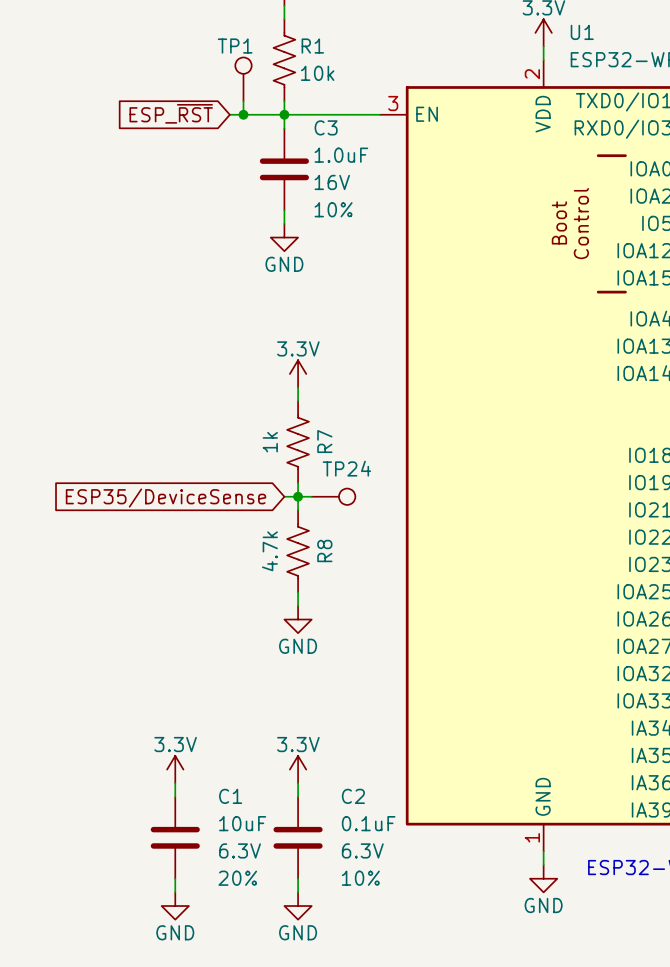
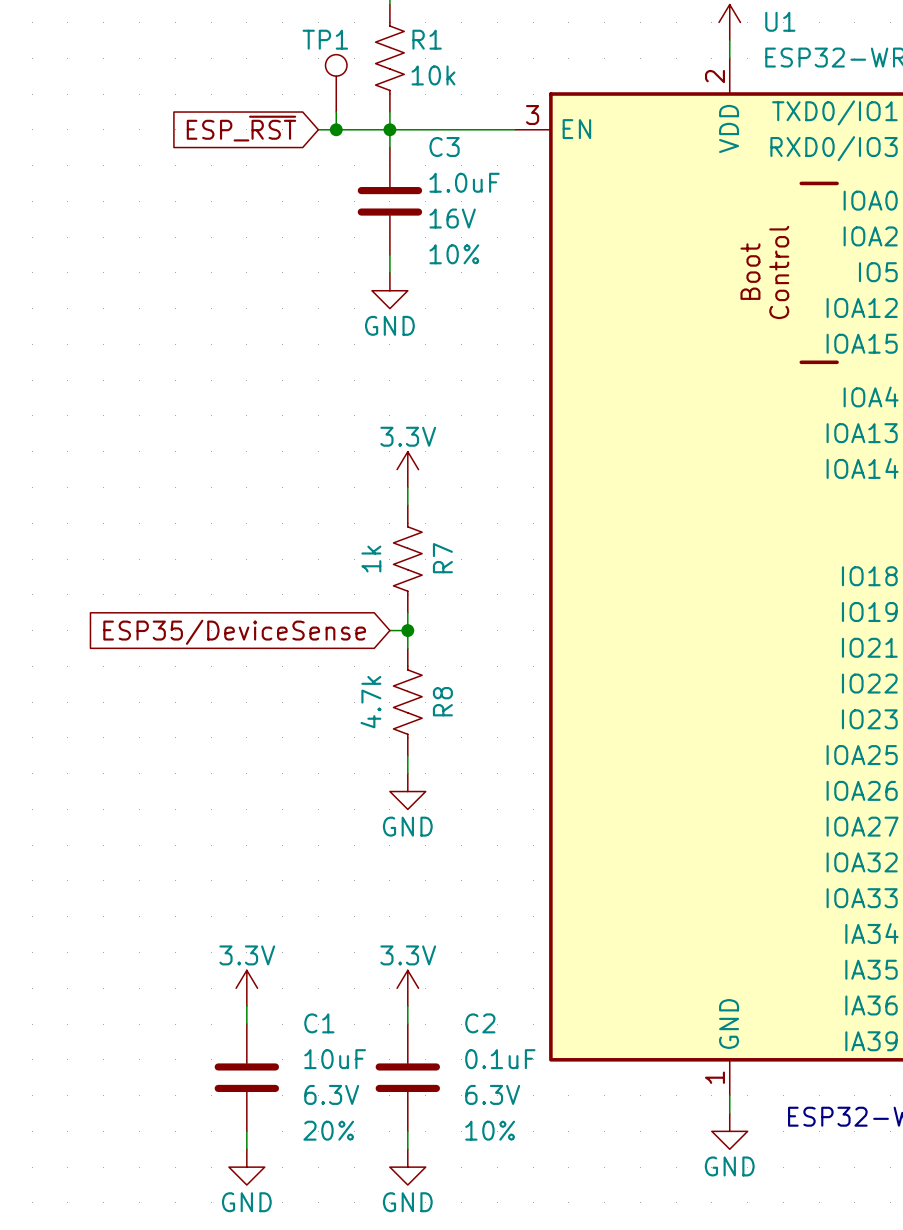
wire: (298, 496) (311, 496) -> none
TP24: (333, 496) -> none

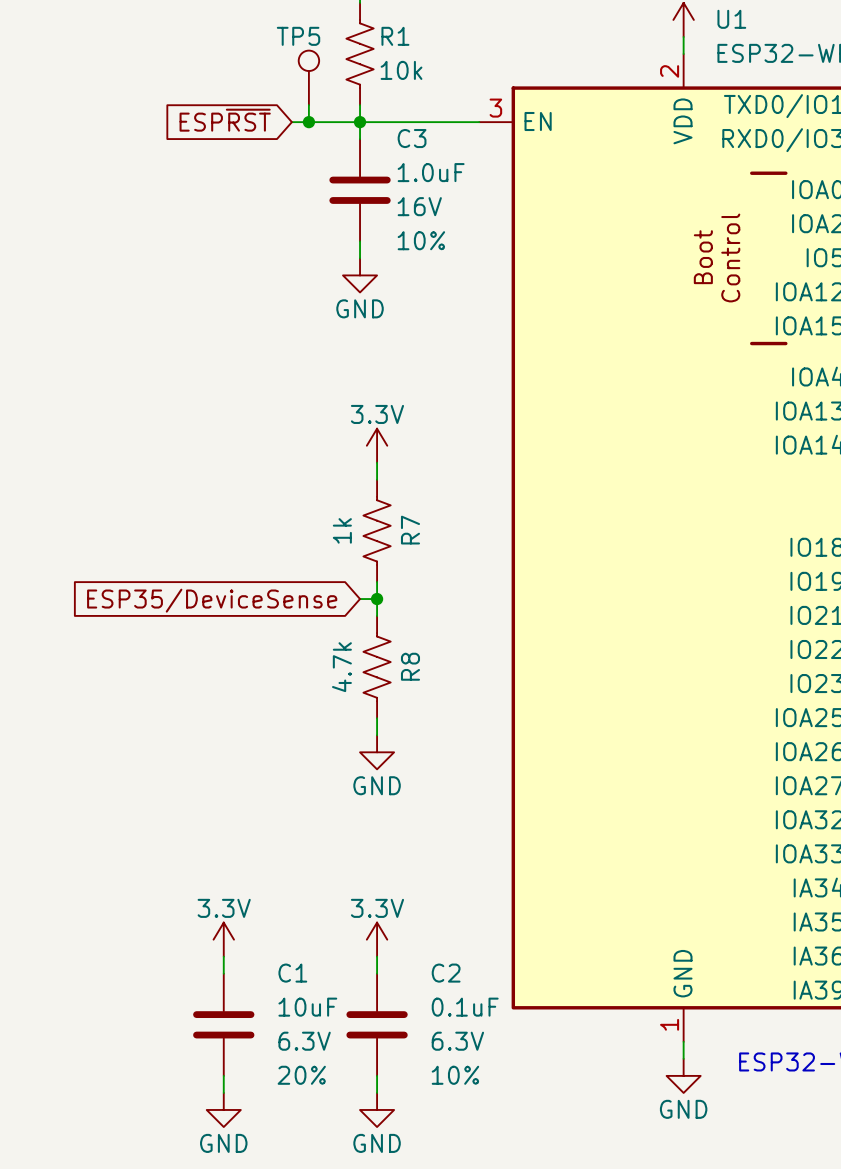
TP1 name: TP1 (325, 39) -> TP5 (298, 36)
global label: ESP_~{RST} (241, 128) -> ESP~{RST} (225, 120)

